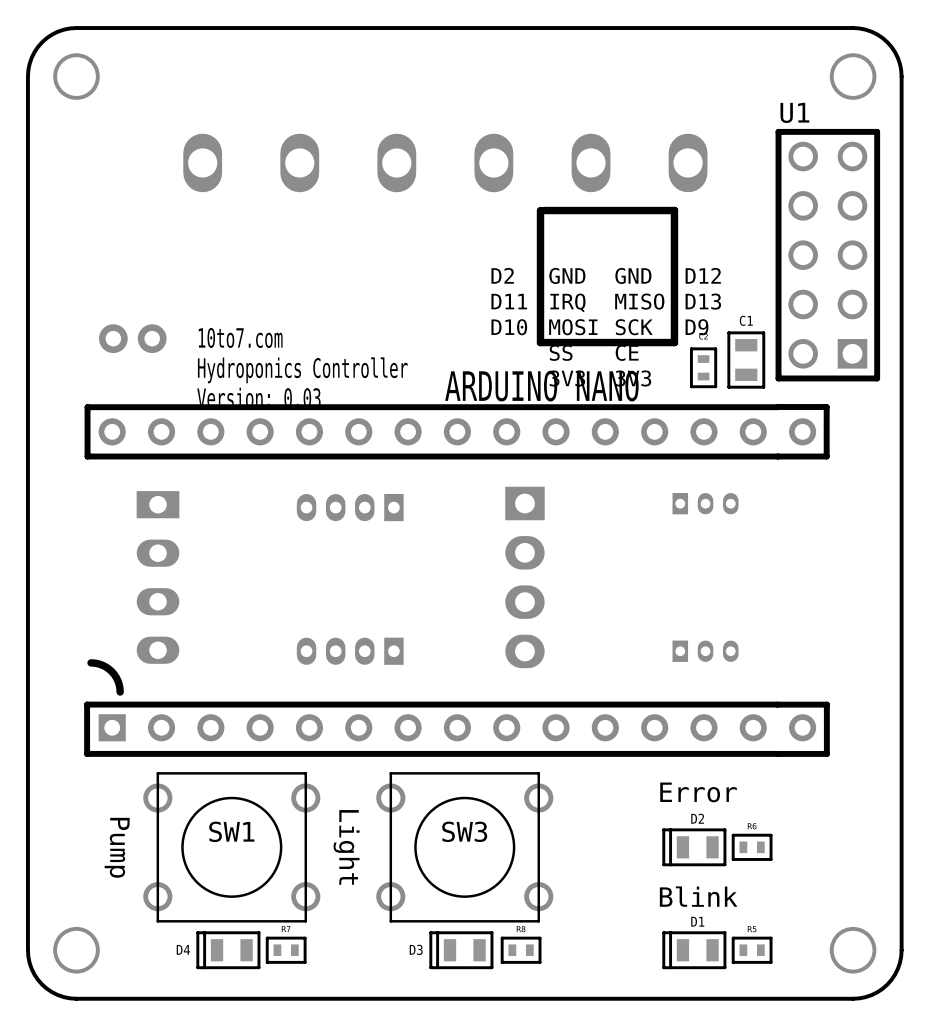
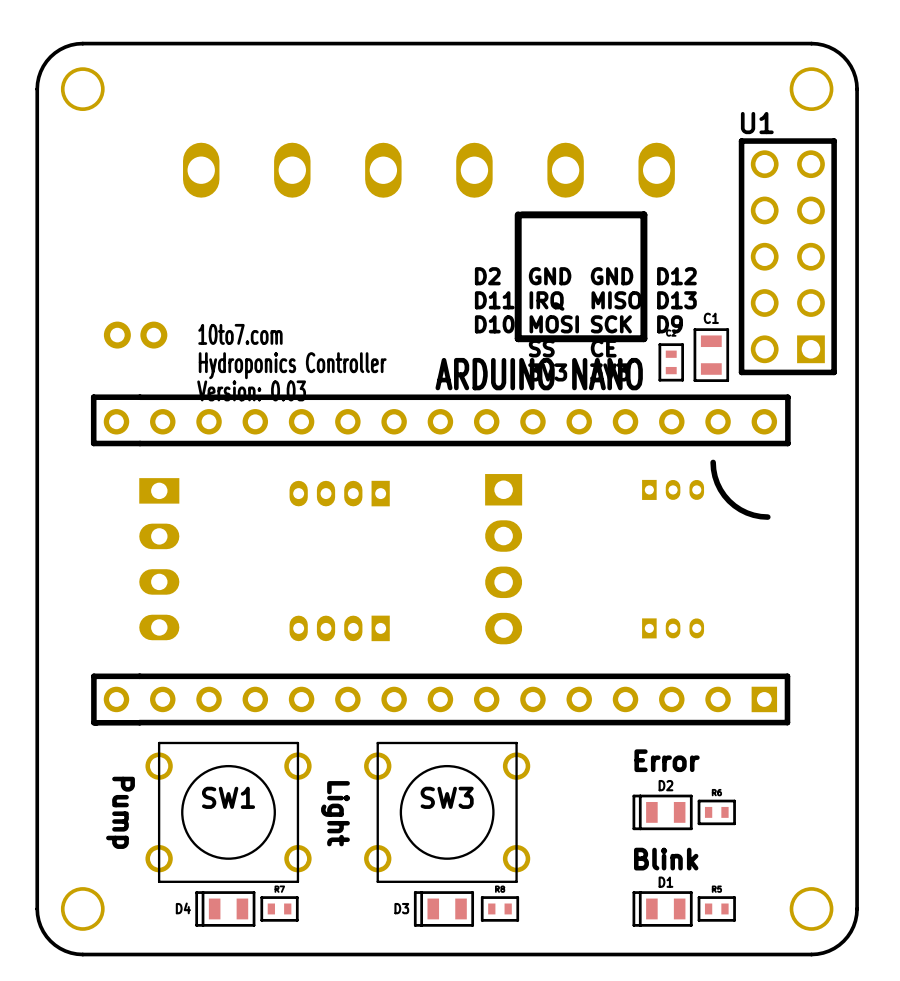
part footprint: [84, 404, 830, 757] -> [90, 394, 791, 726]

